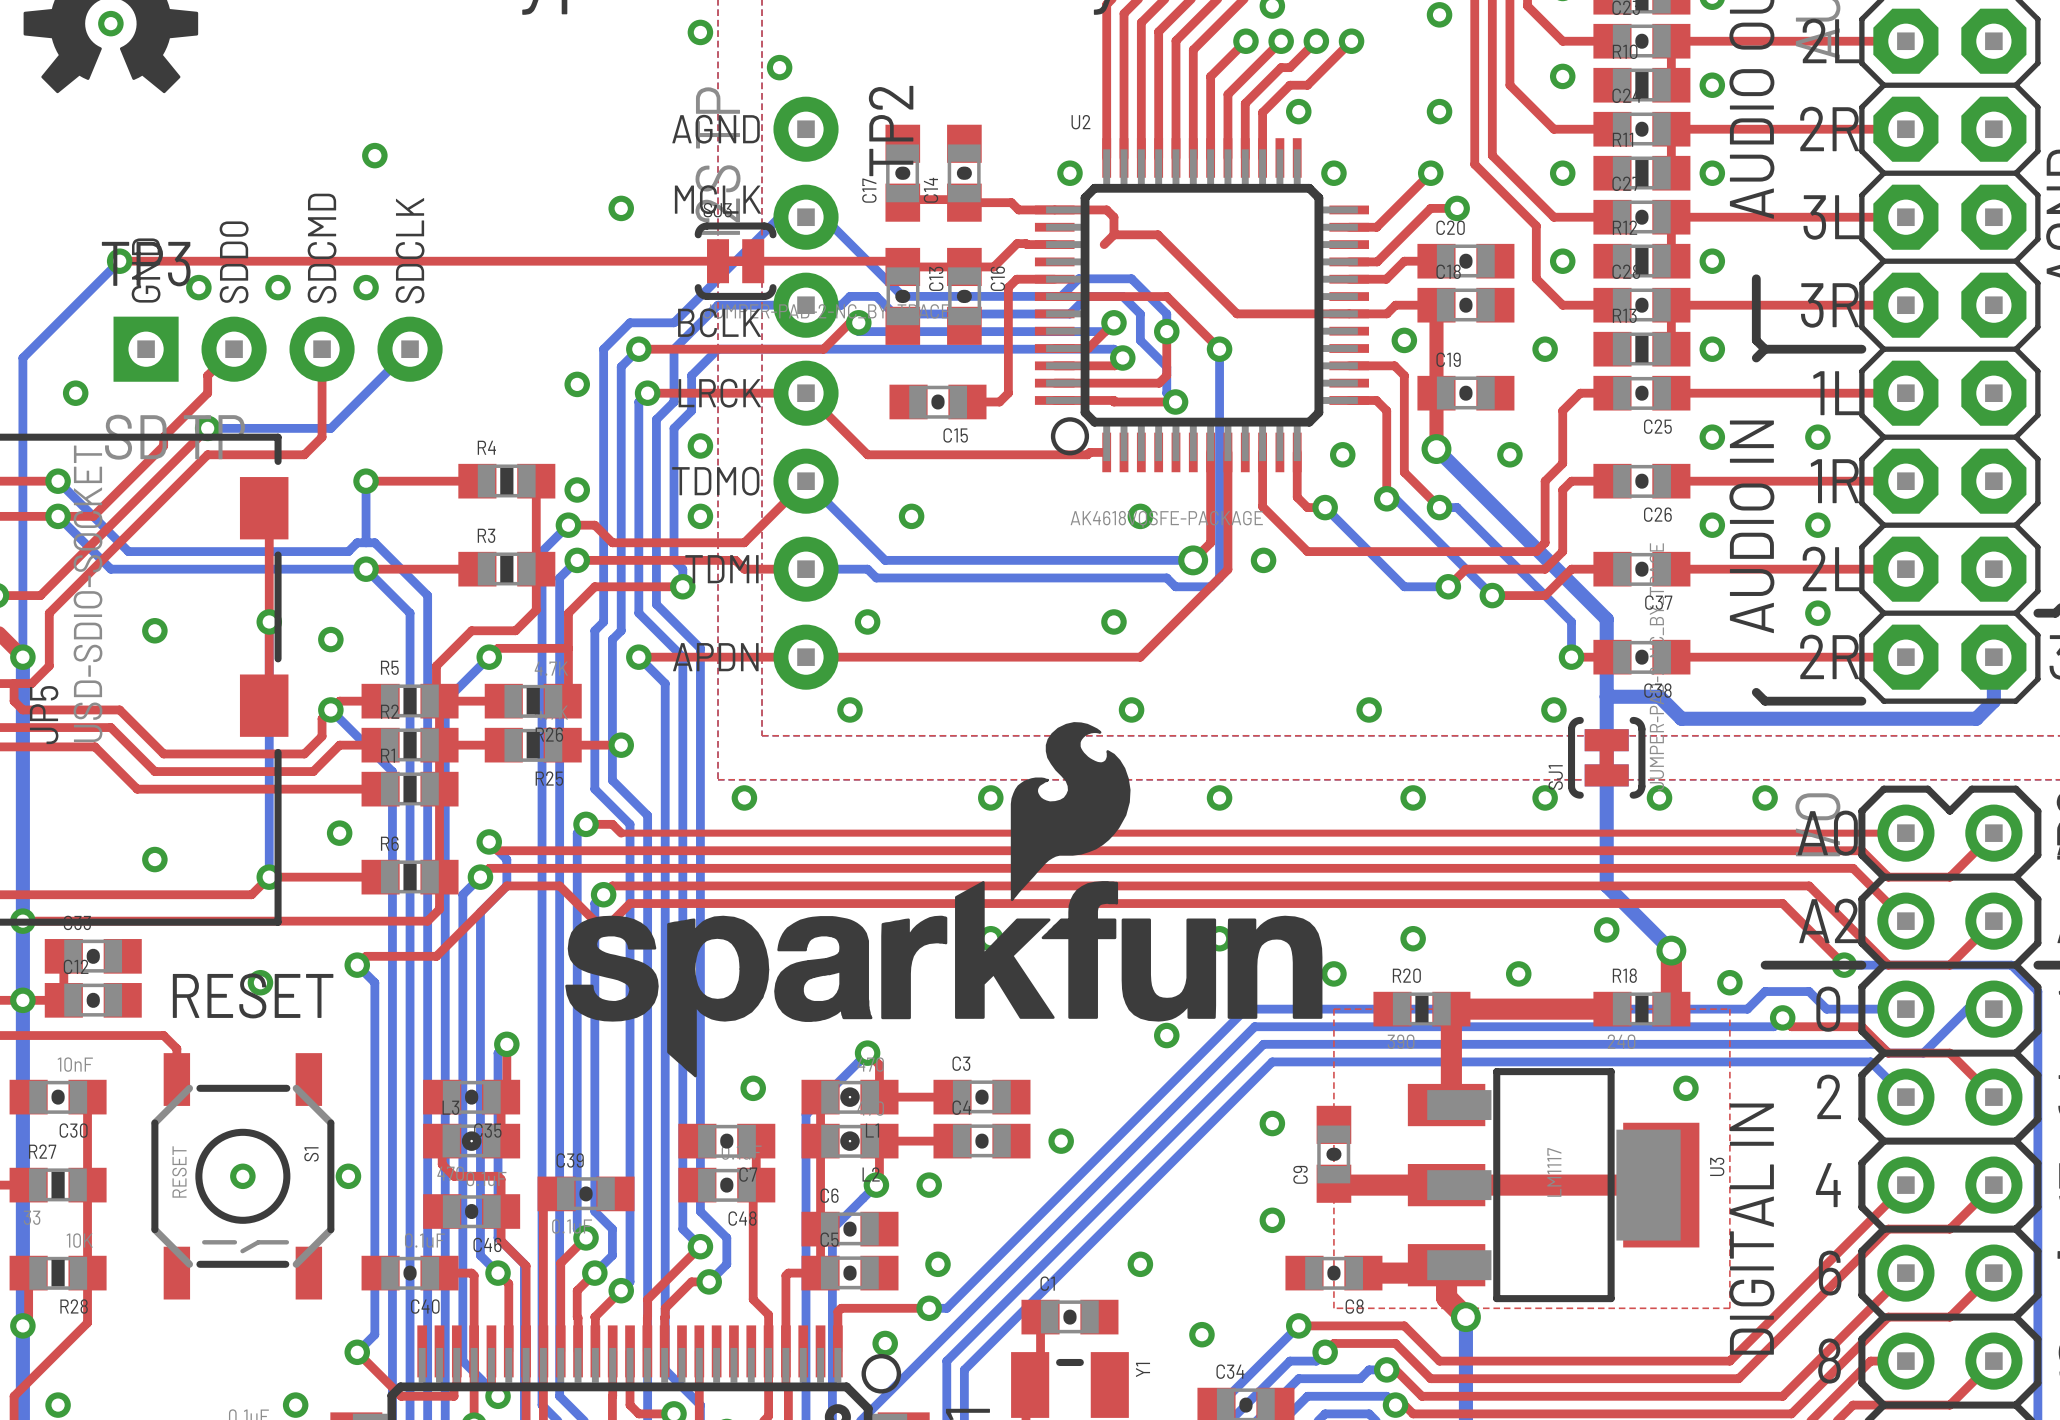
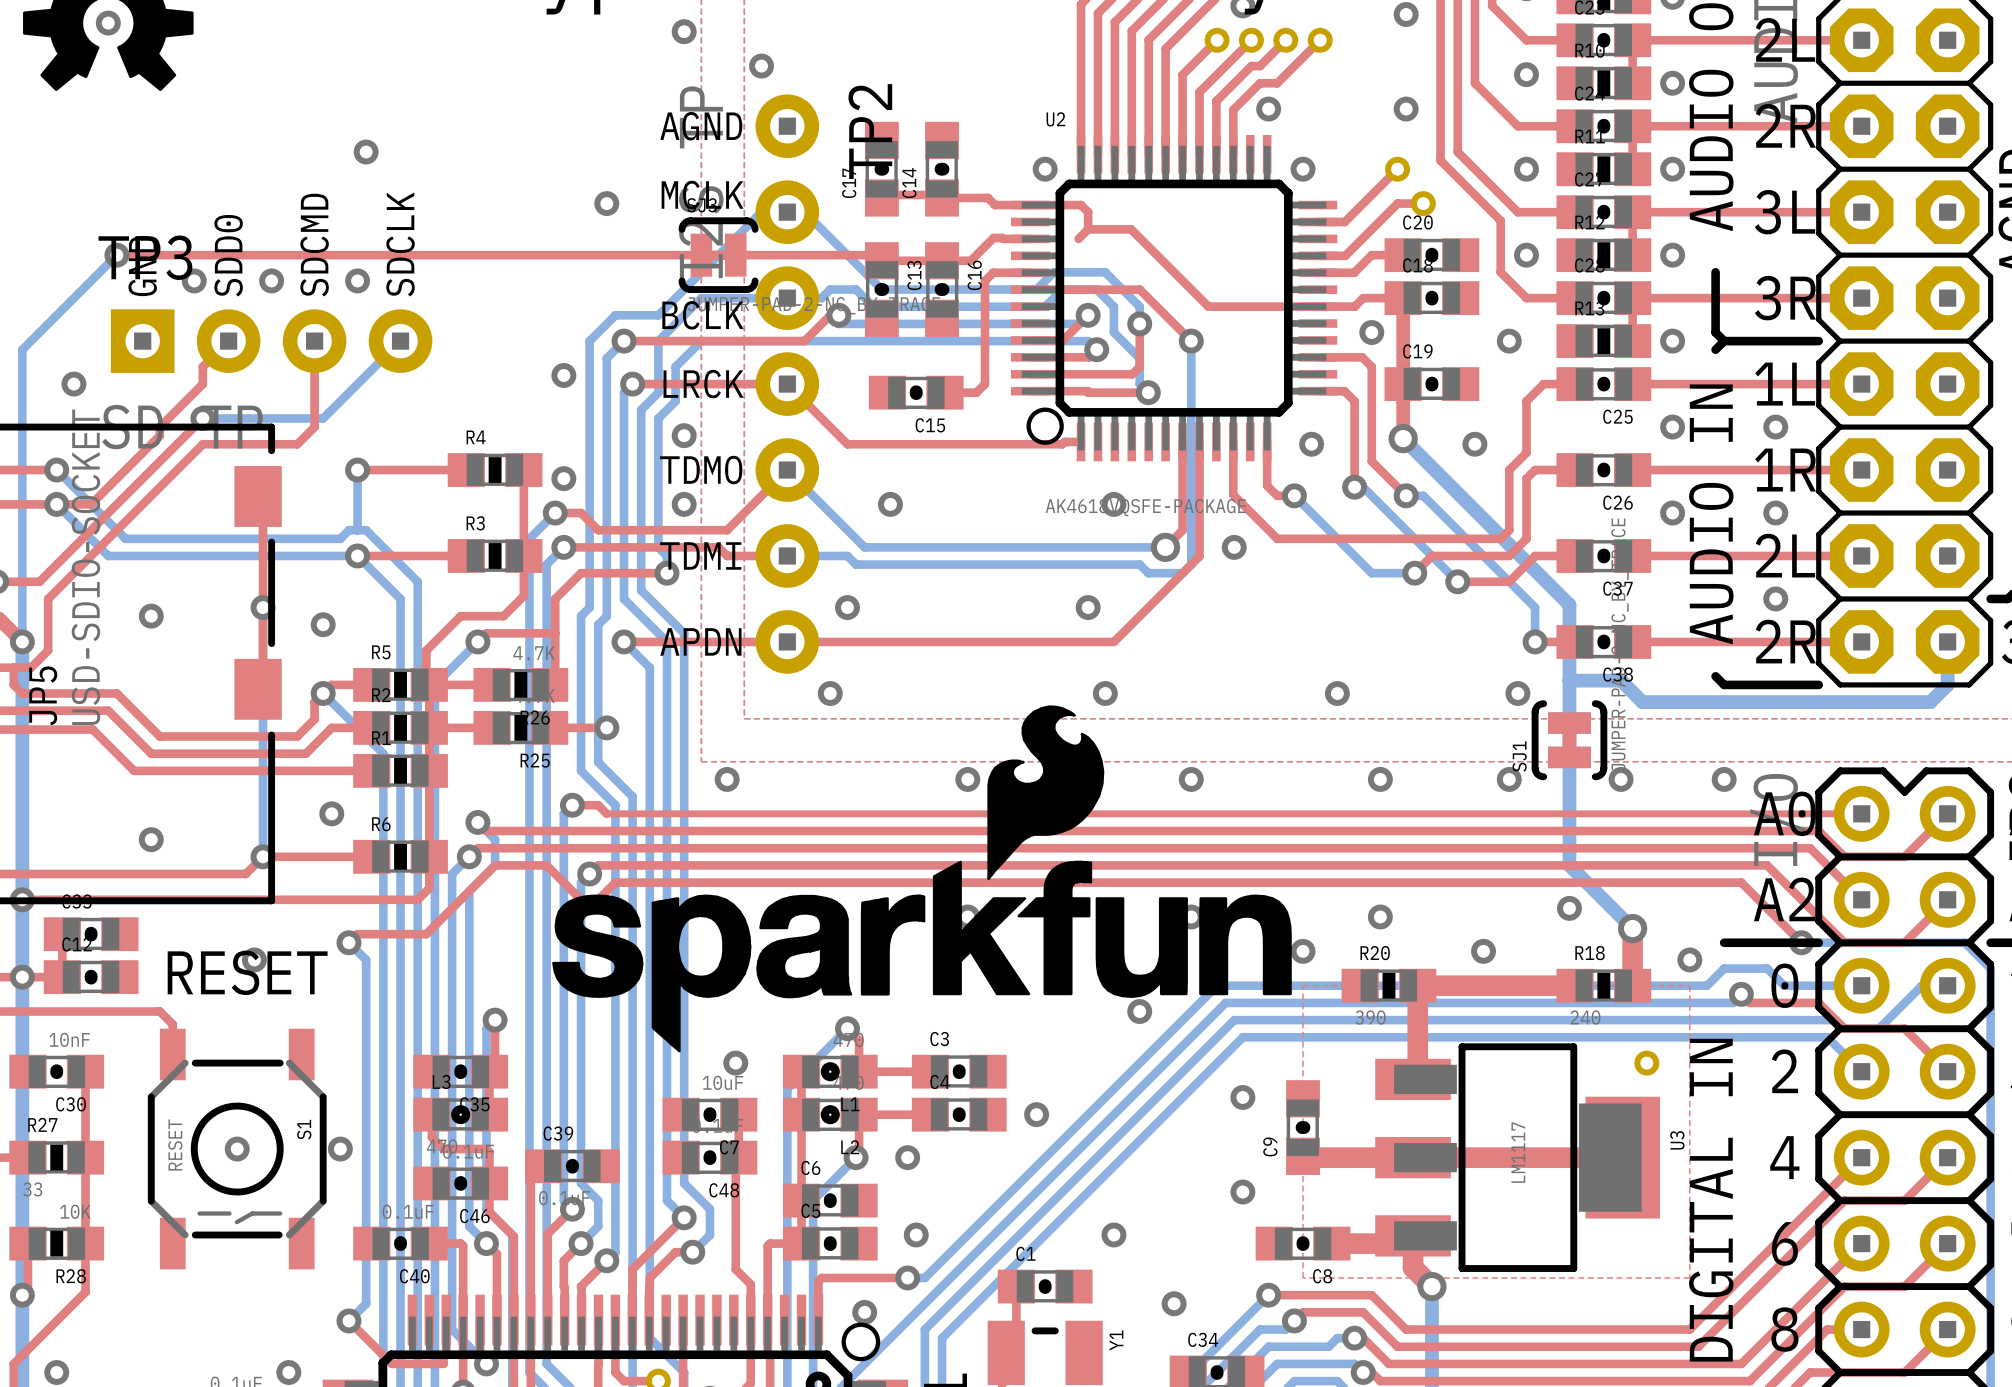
C7 value: none -> 10uF (722, 1082)

